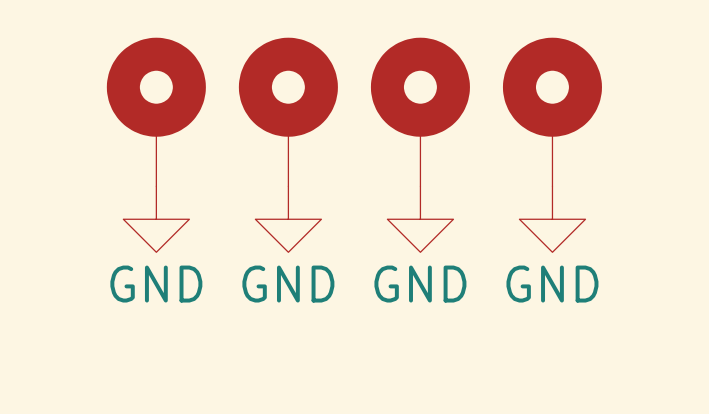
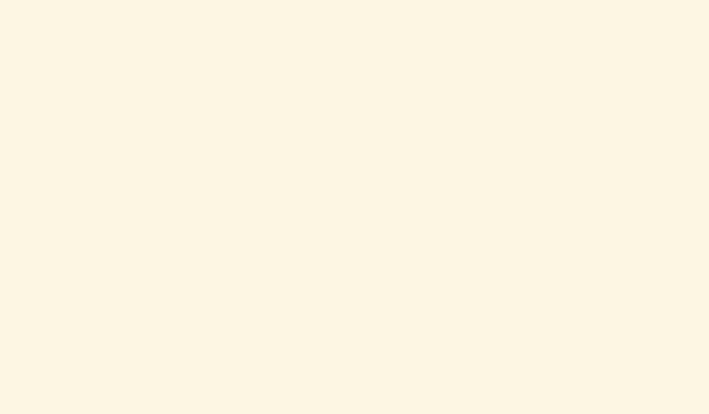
part: (156, 111) -> none
part: (288, 111) -> none
part: (420, 111) -> none
part: (552, 111) -> none
power symbol: GND (156, 219) -> none
power symbol: GND (288, 219) -> none
power symbol: GND (420, 219) -> none
power symbol: GND (552, 219) -> none

